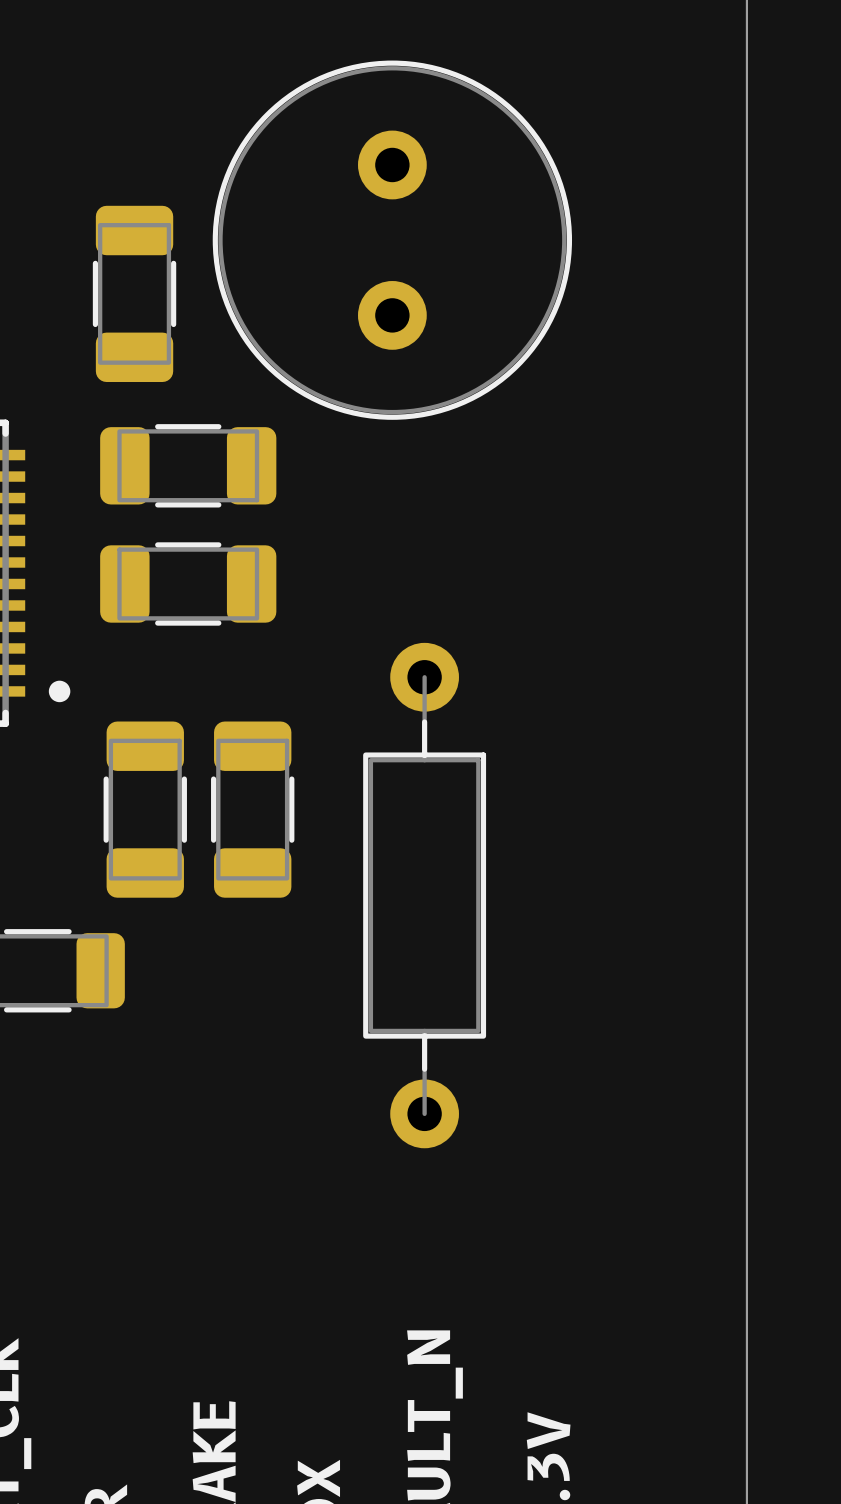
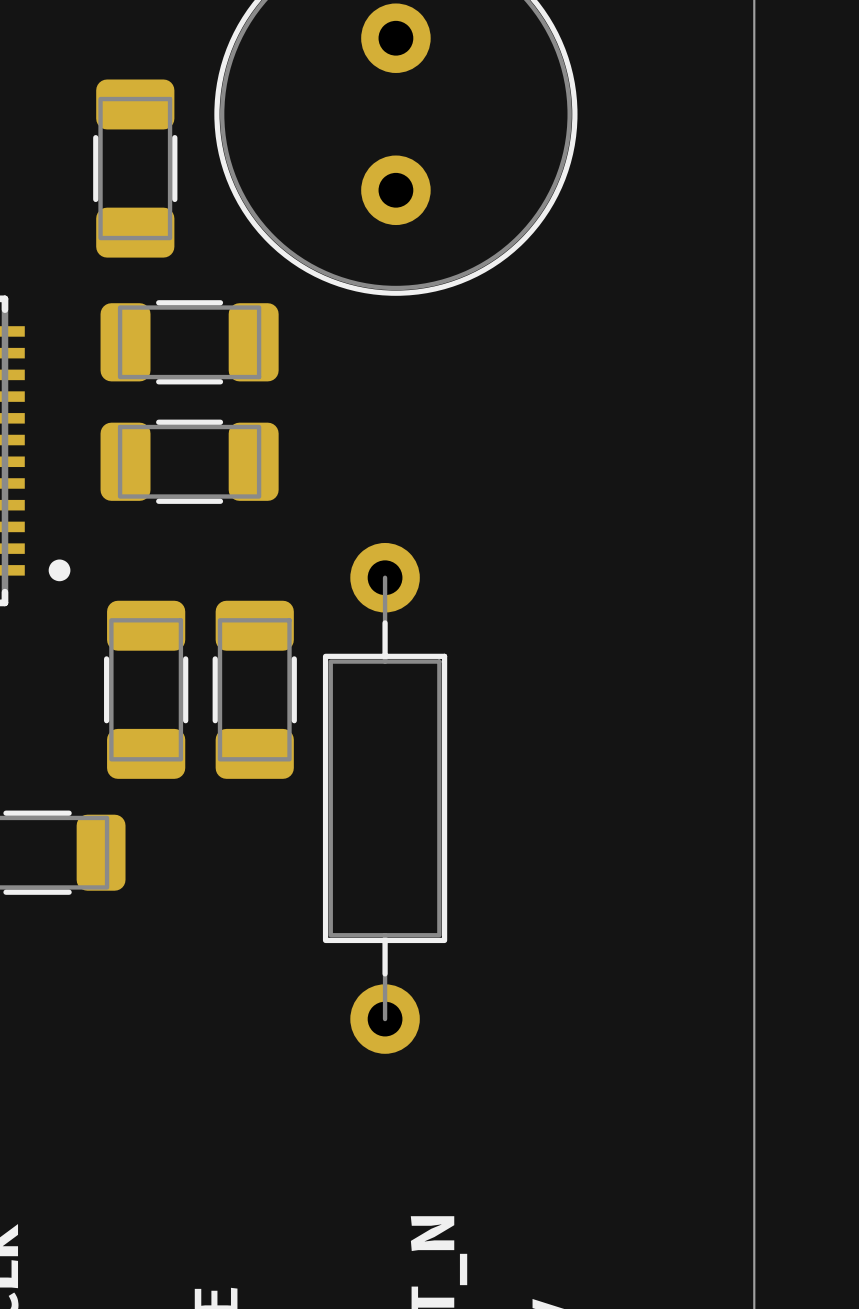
part position: (424, 895) -> (385, 798)

